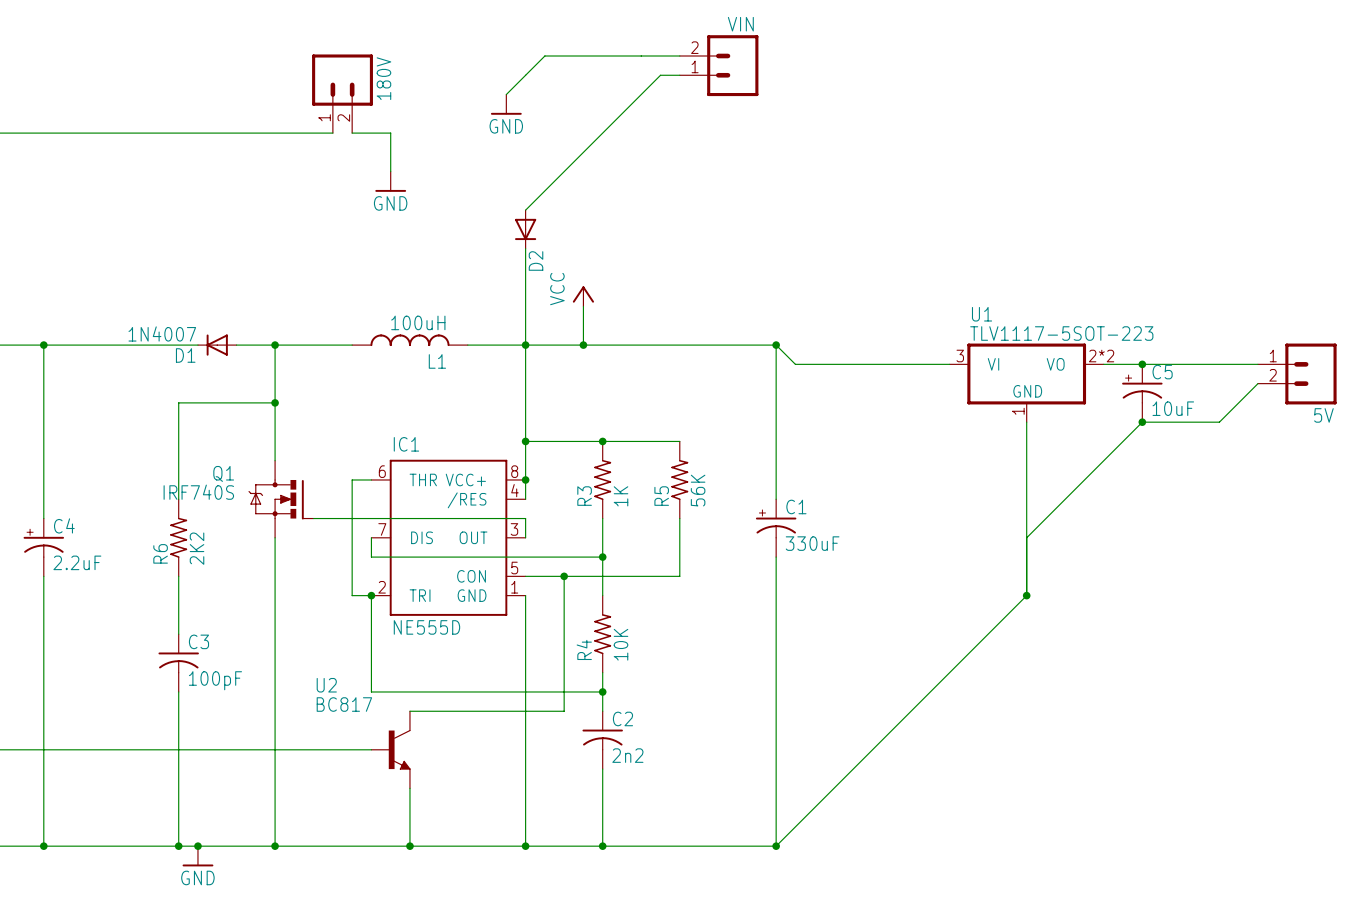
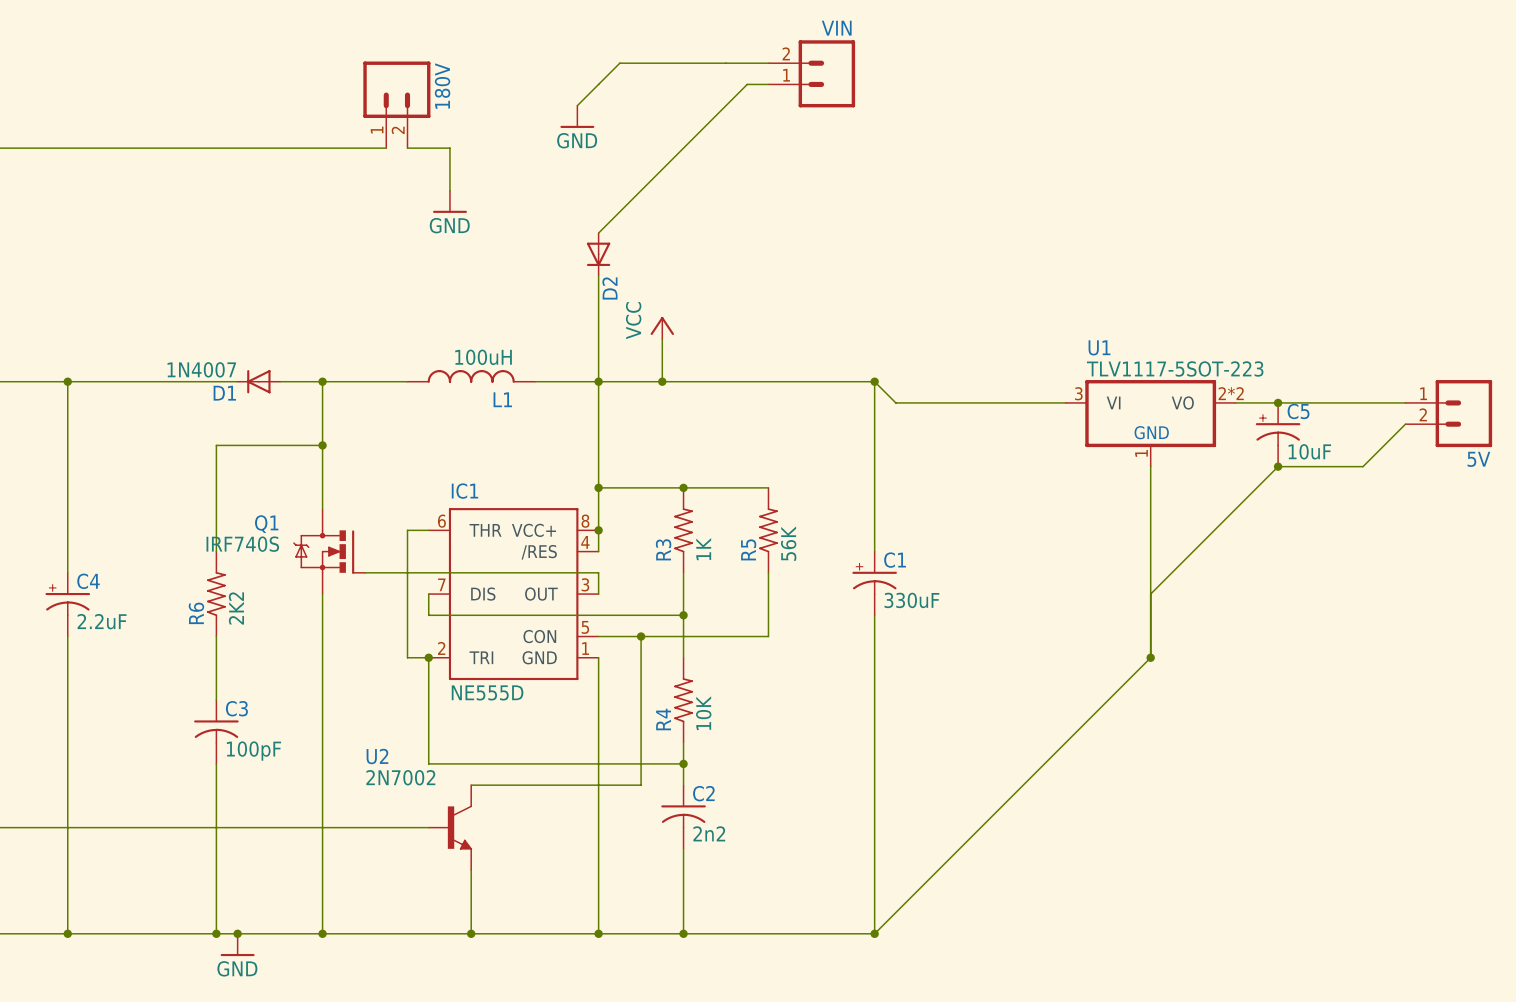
U2 value: BC817 (344, 704) -> 2N7002 (400, 777)

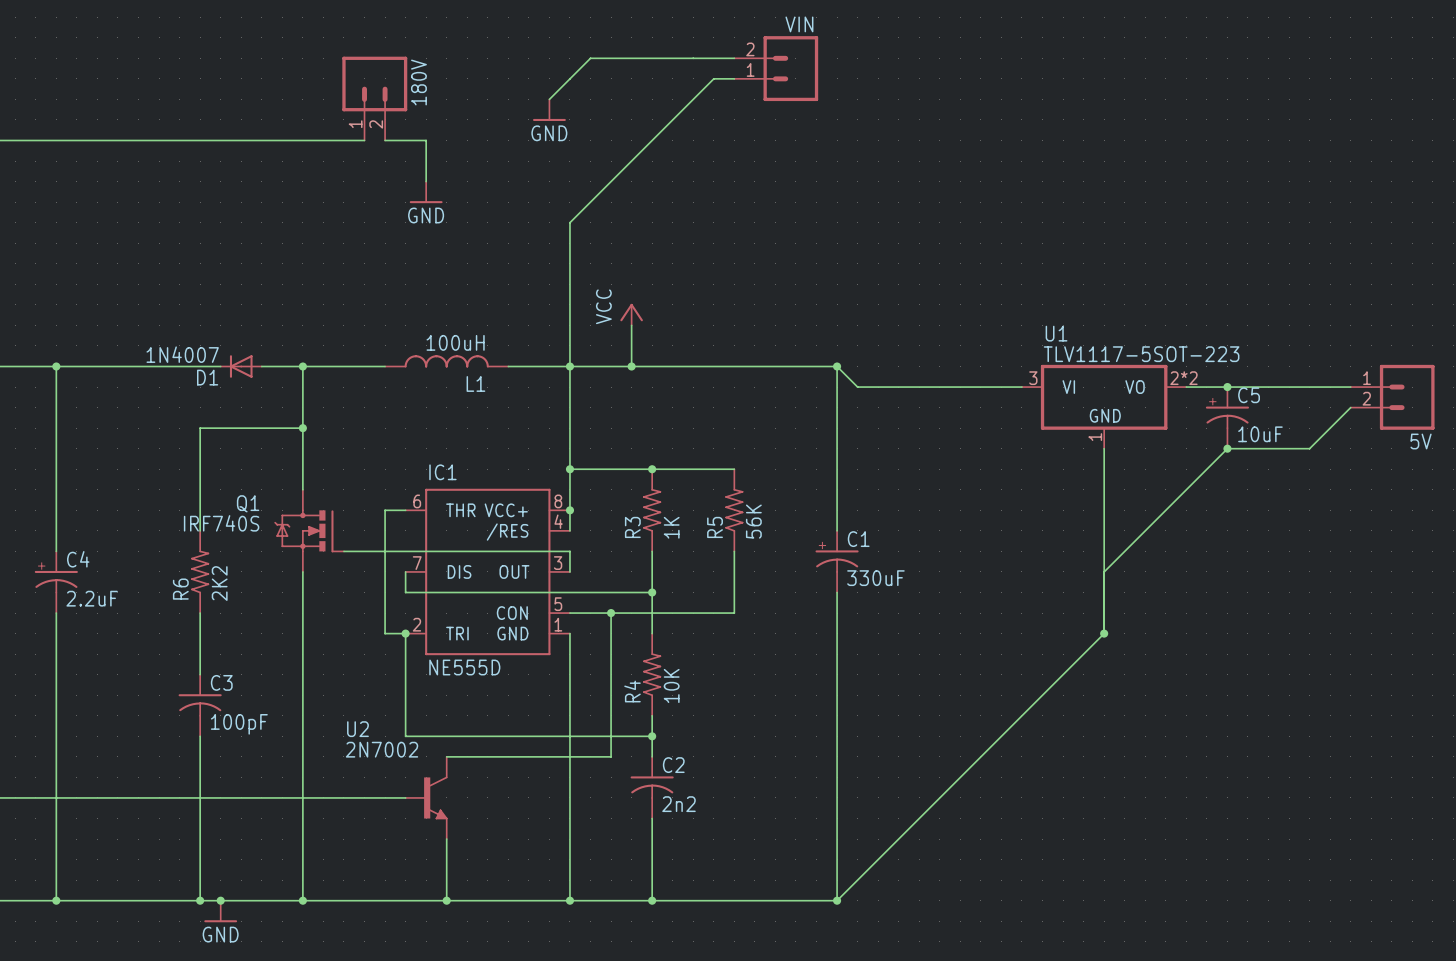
D2: (598, 254) -> none

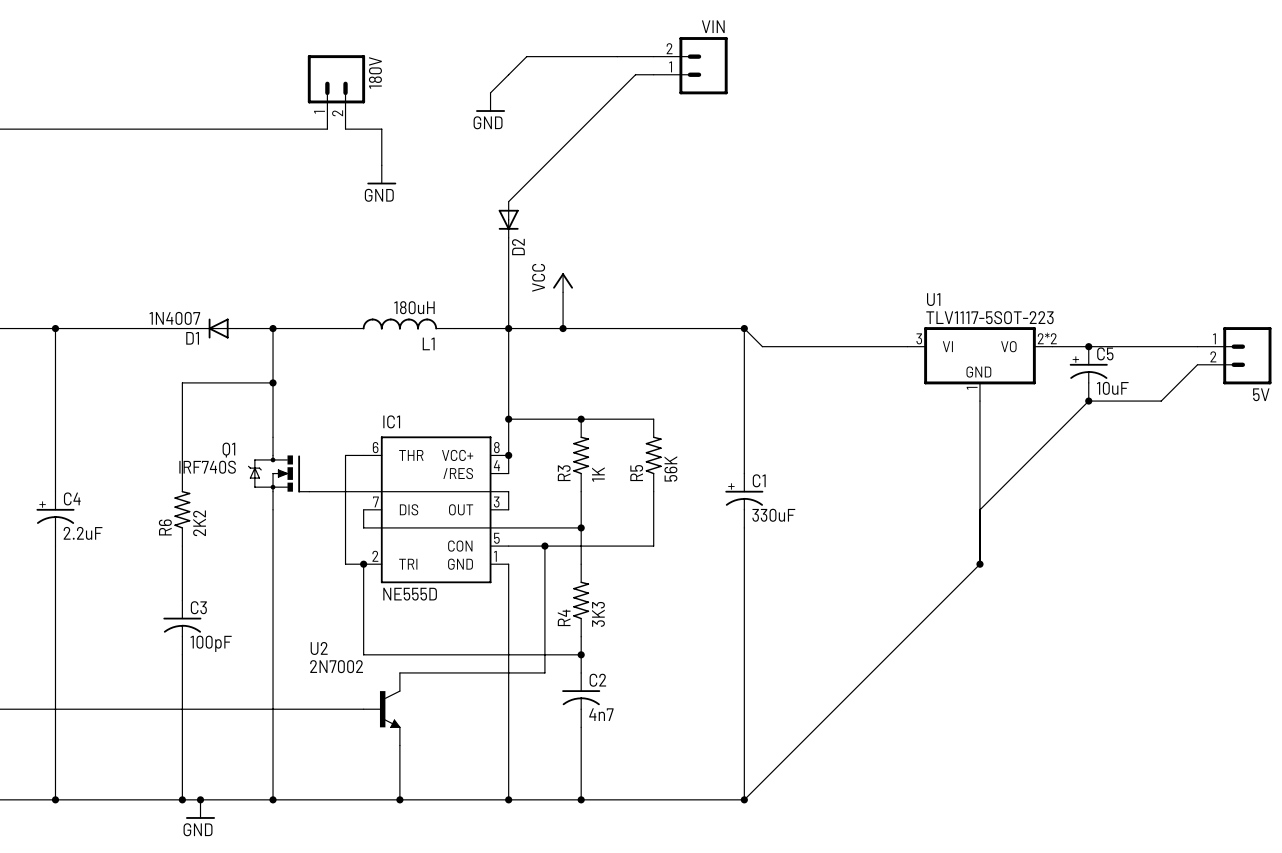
D2: none -> (508, 219)
L1 value: 100uH (455, 342) -> 180uH (414, 307)
R4 value: 10K (671, 685) -> 3K3 (598, 614)
C2 value: 2n2 (679, 804) -> 4n7 (601, 714)

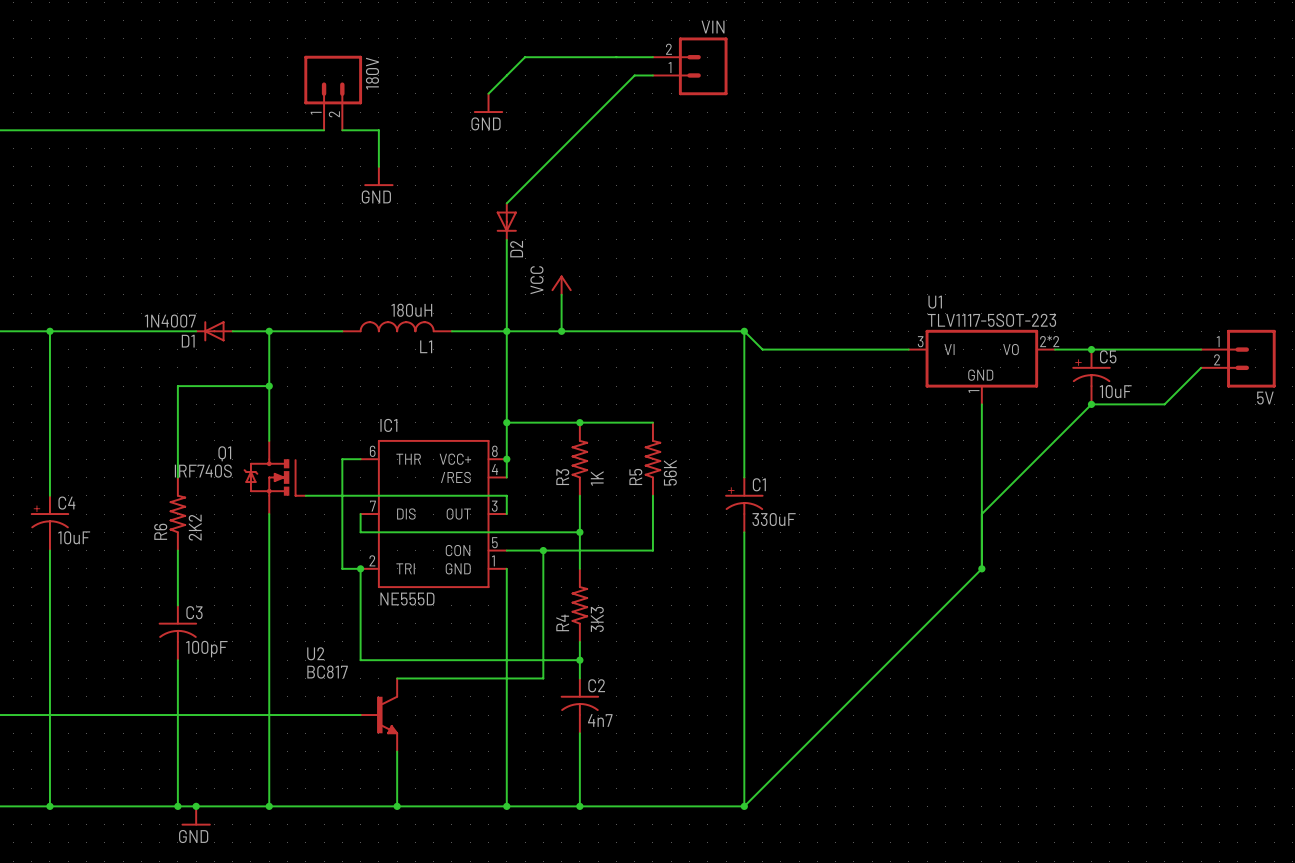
C4 value: 2.2uF (83, 533) -> 10uF (74, 537)
U2 value: 2N7002 (336, 666) -> BC817 (327, 672)

